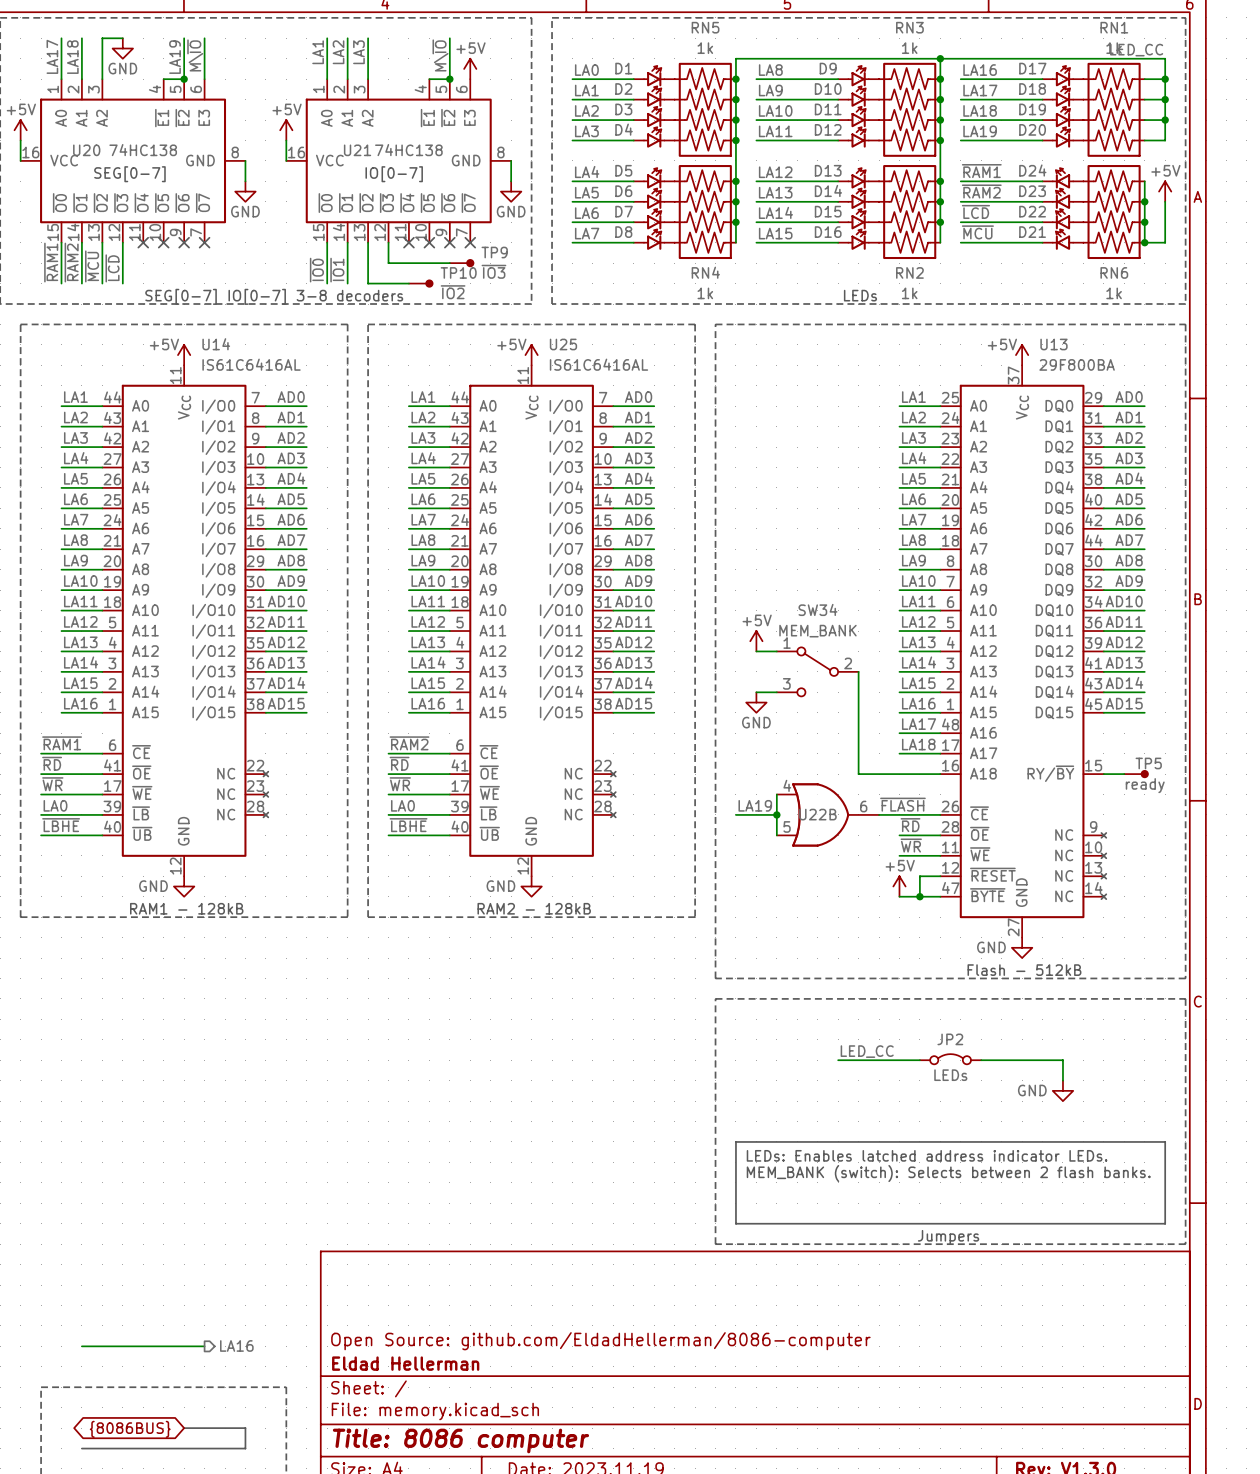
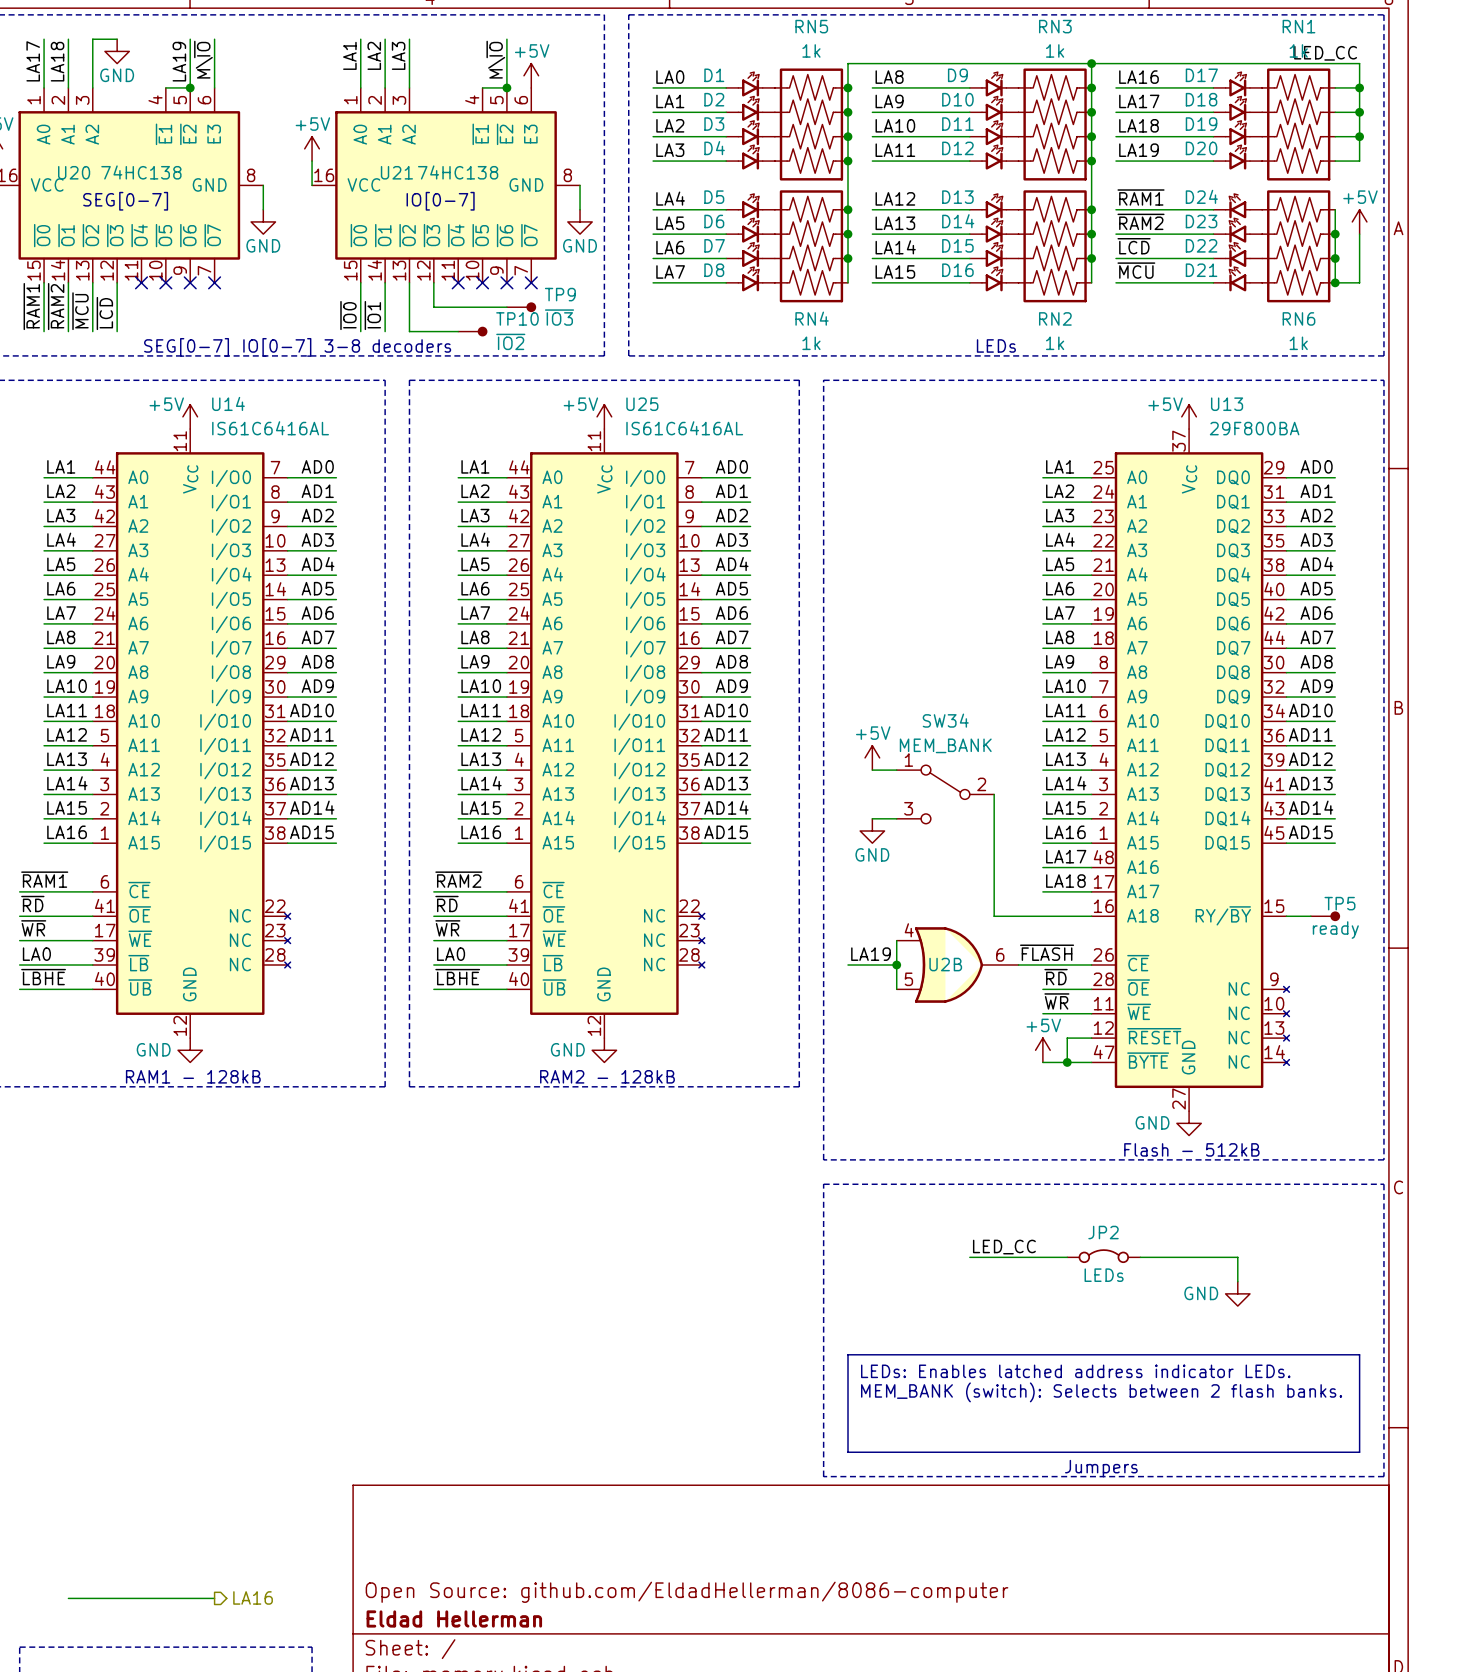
U22B name: U22B (817, 814) -> U2B (945, 964)

